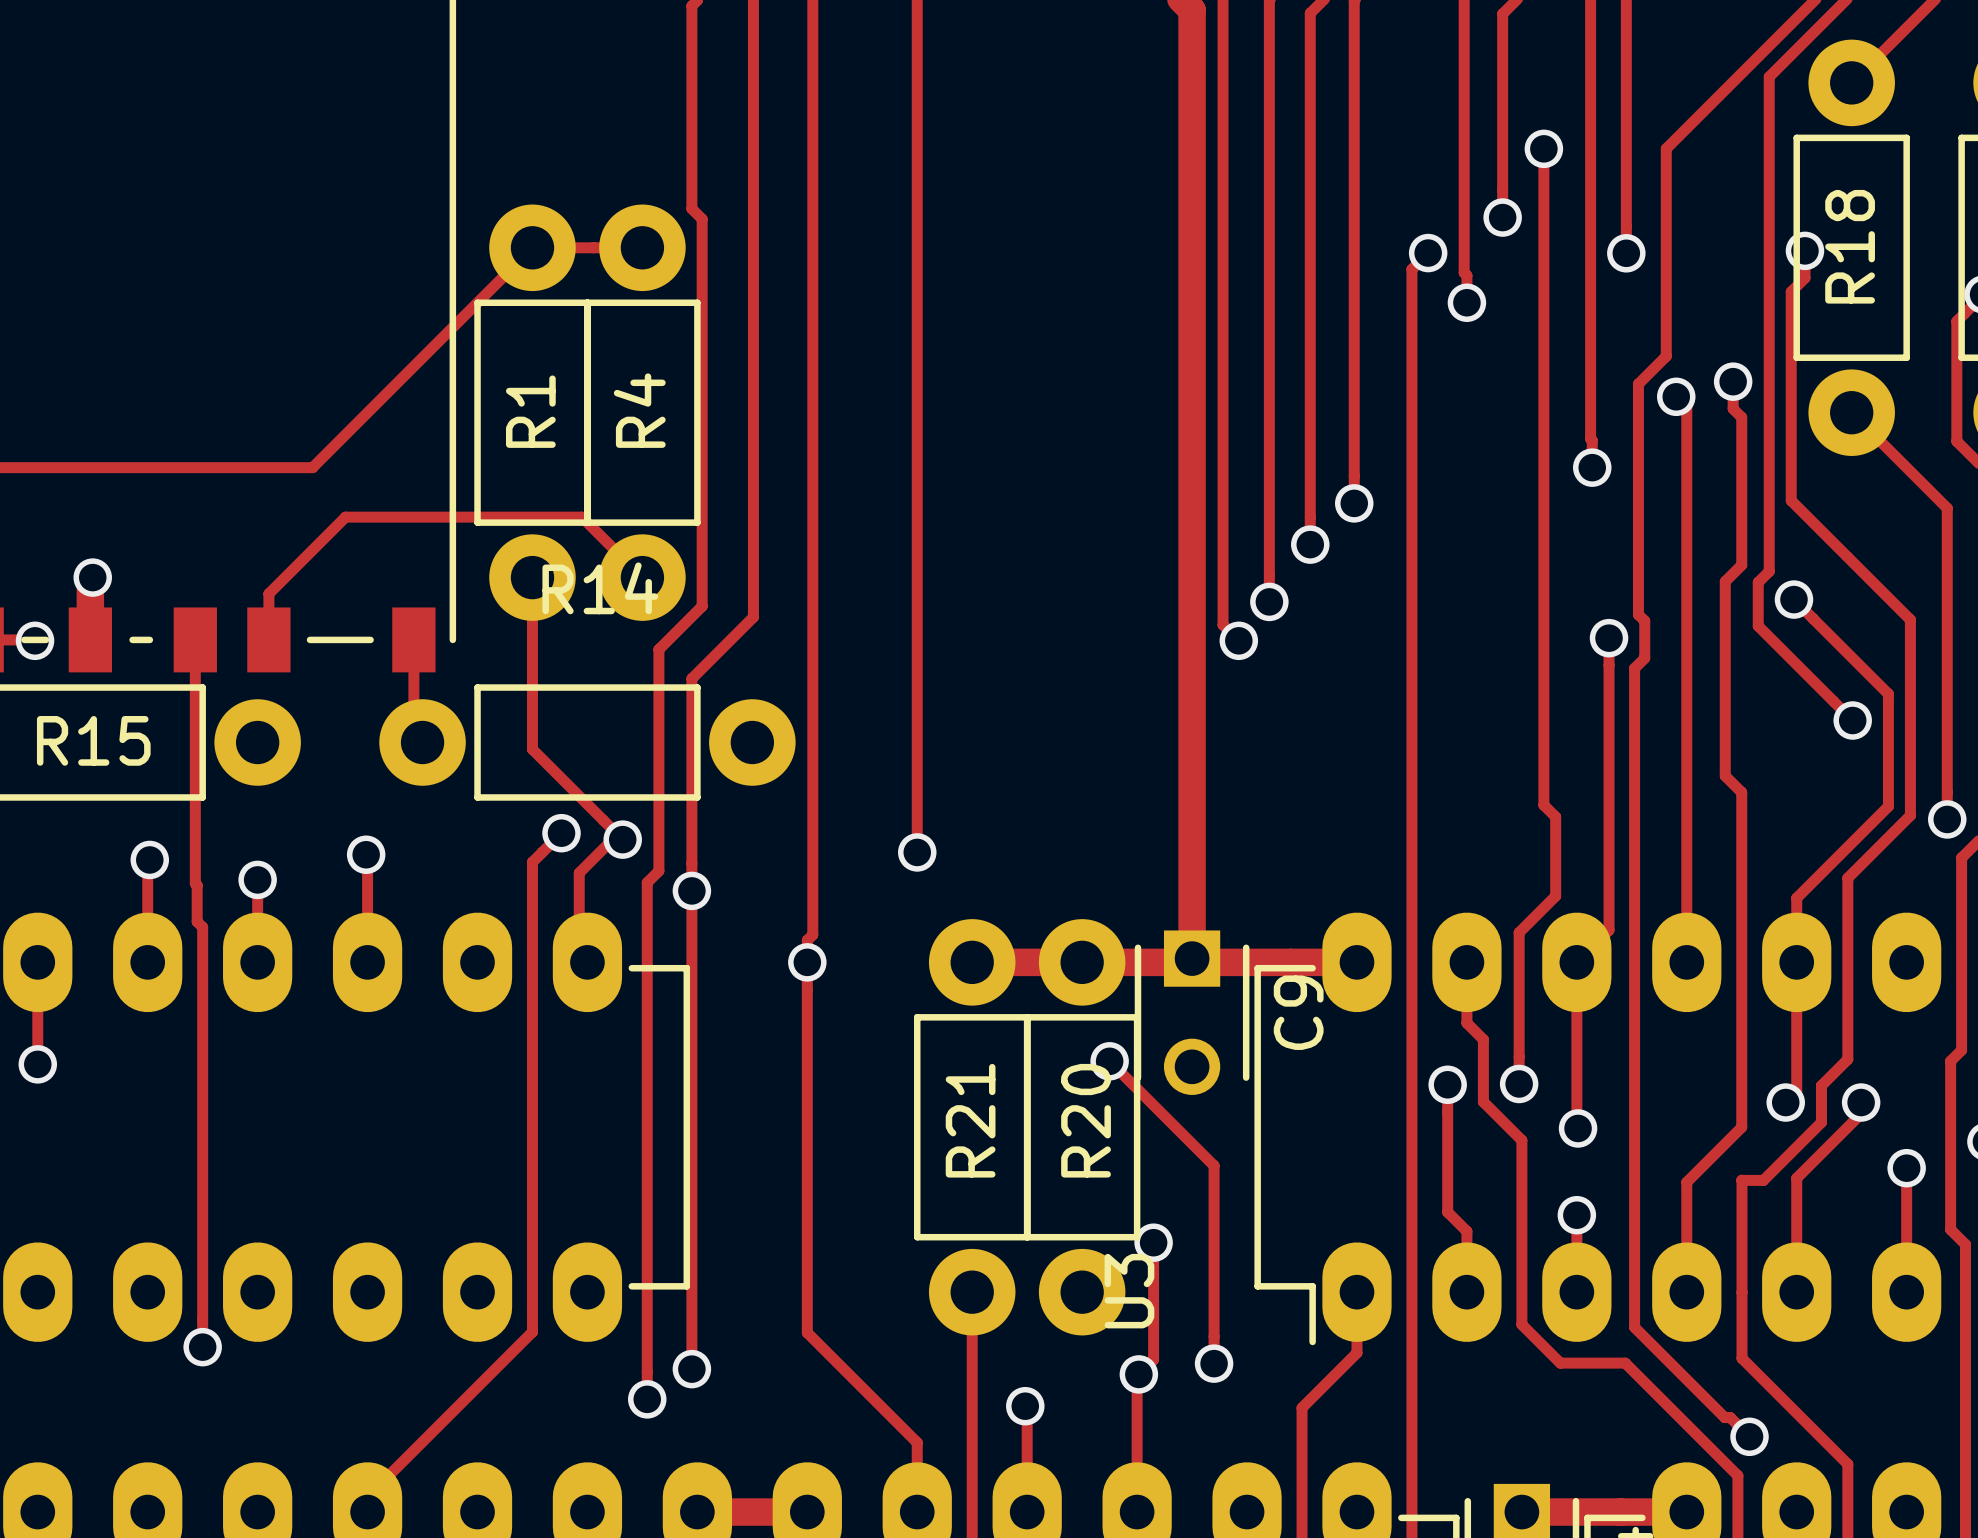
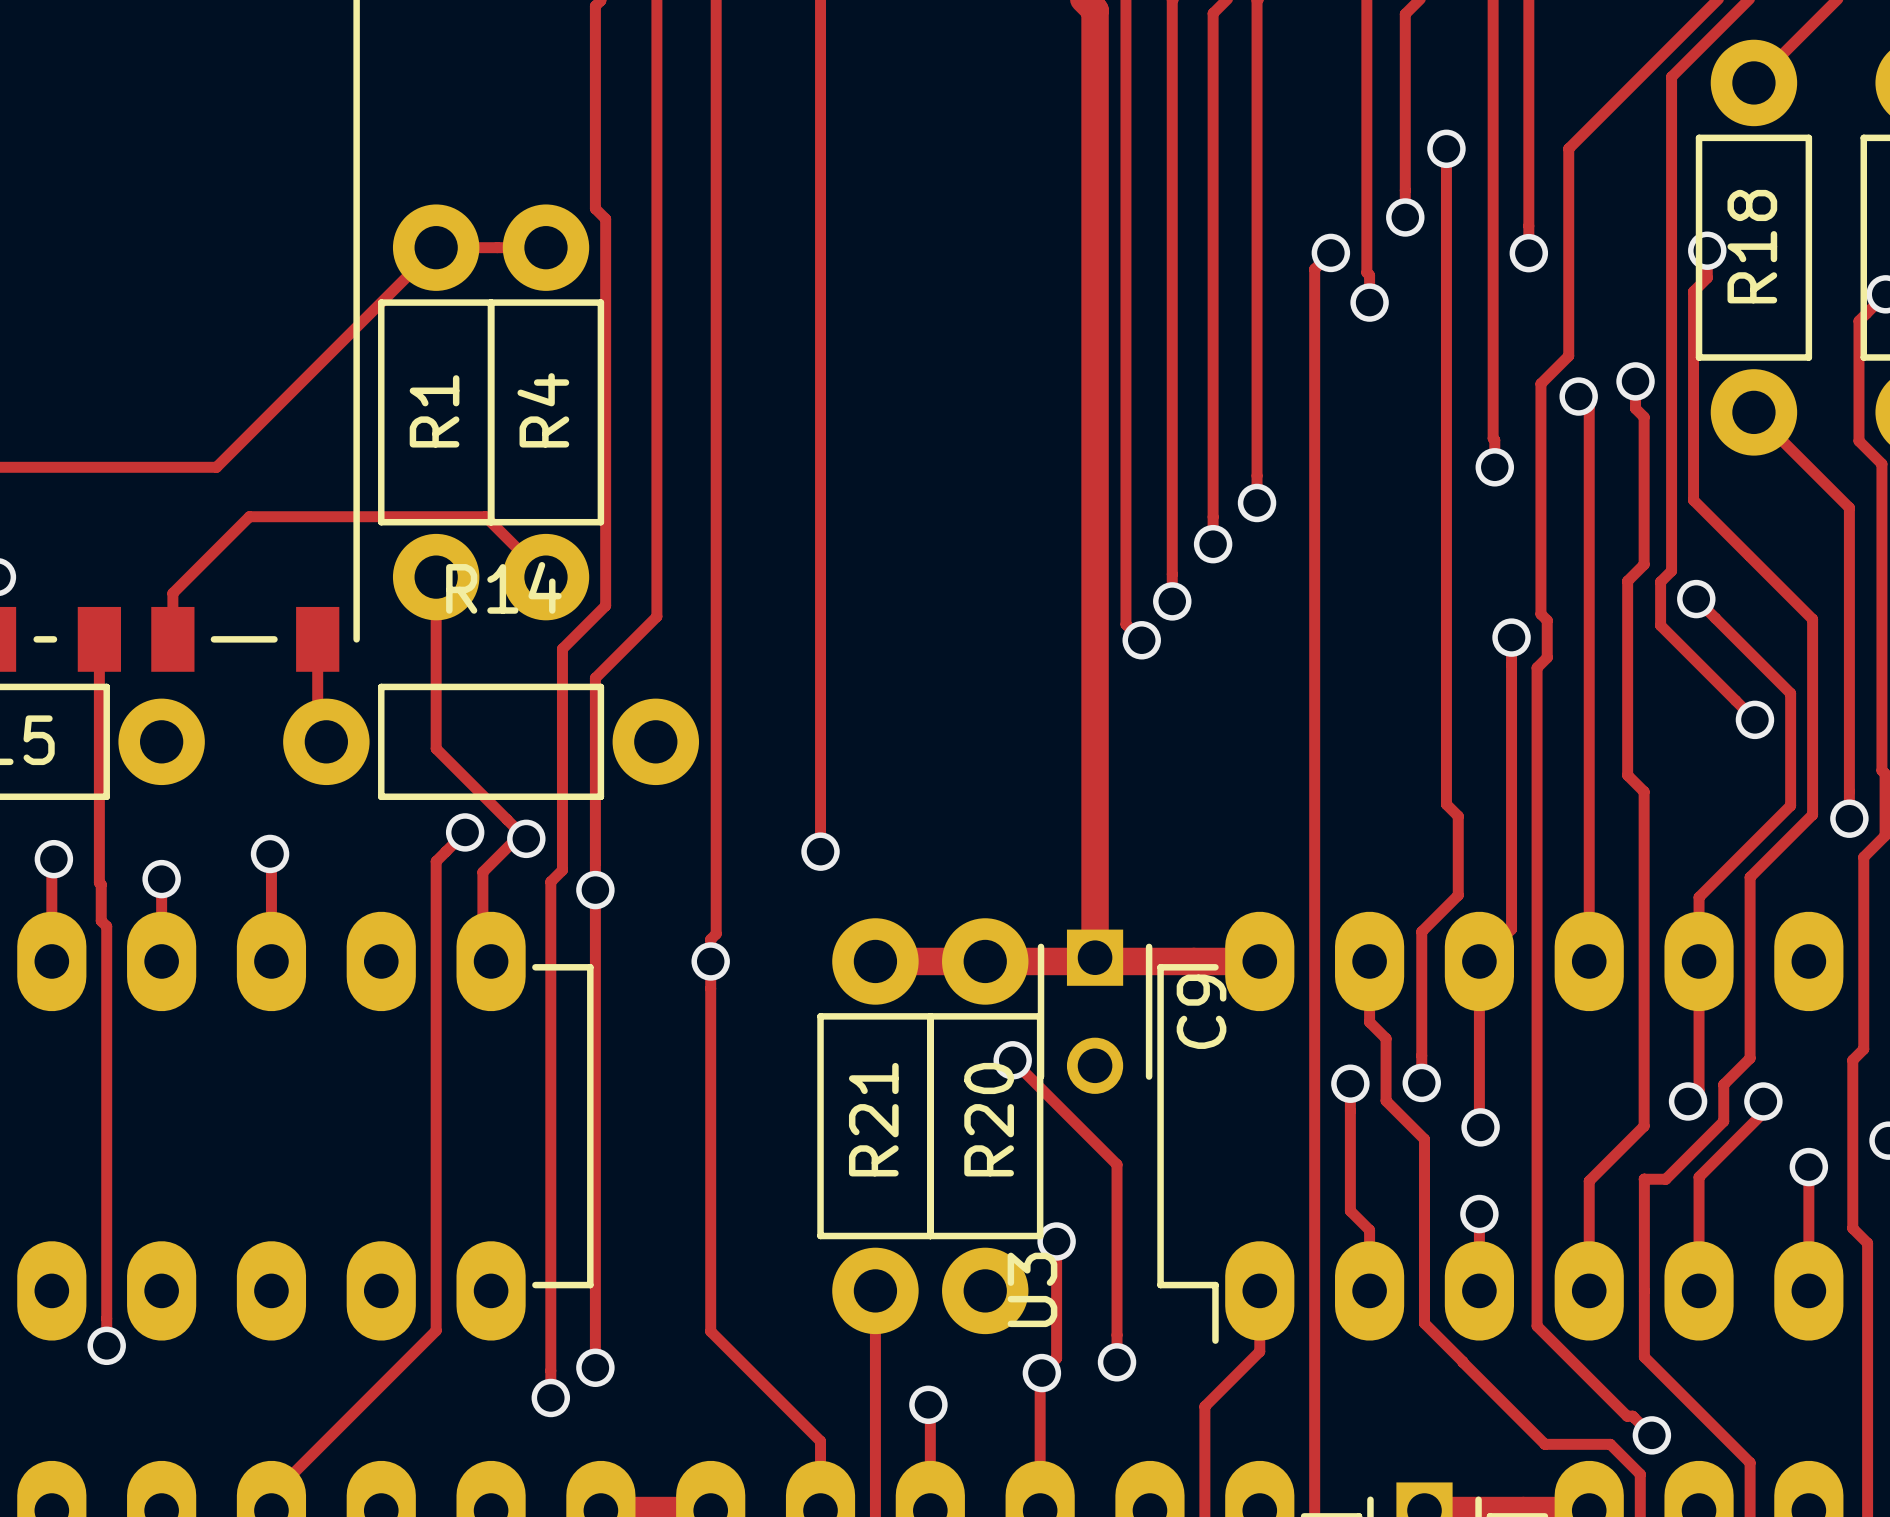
track: (1560, 1363) (1625, 1363) (1707, 1445) -> (1462, 1362) (1544, 1444) (1610, 1444)

